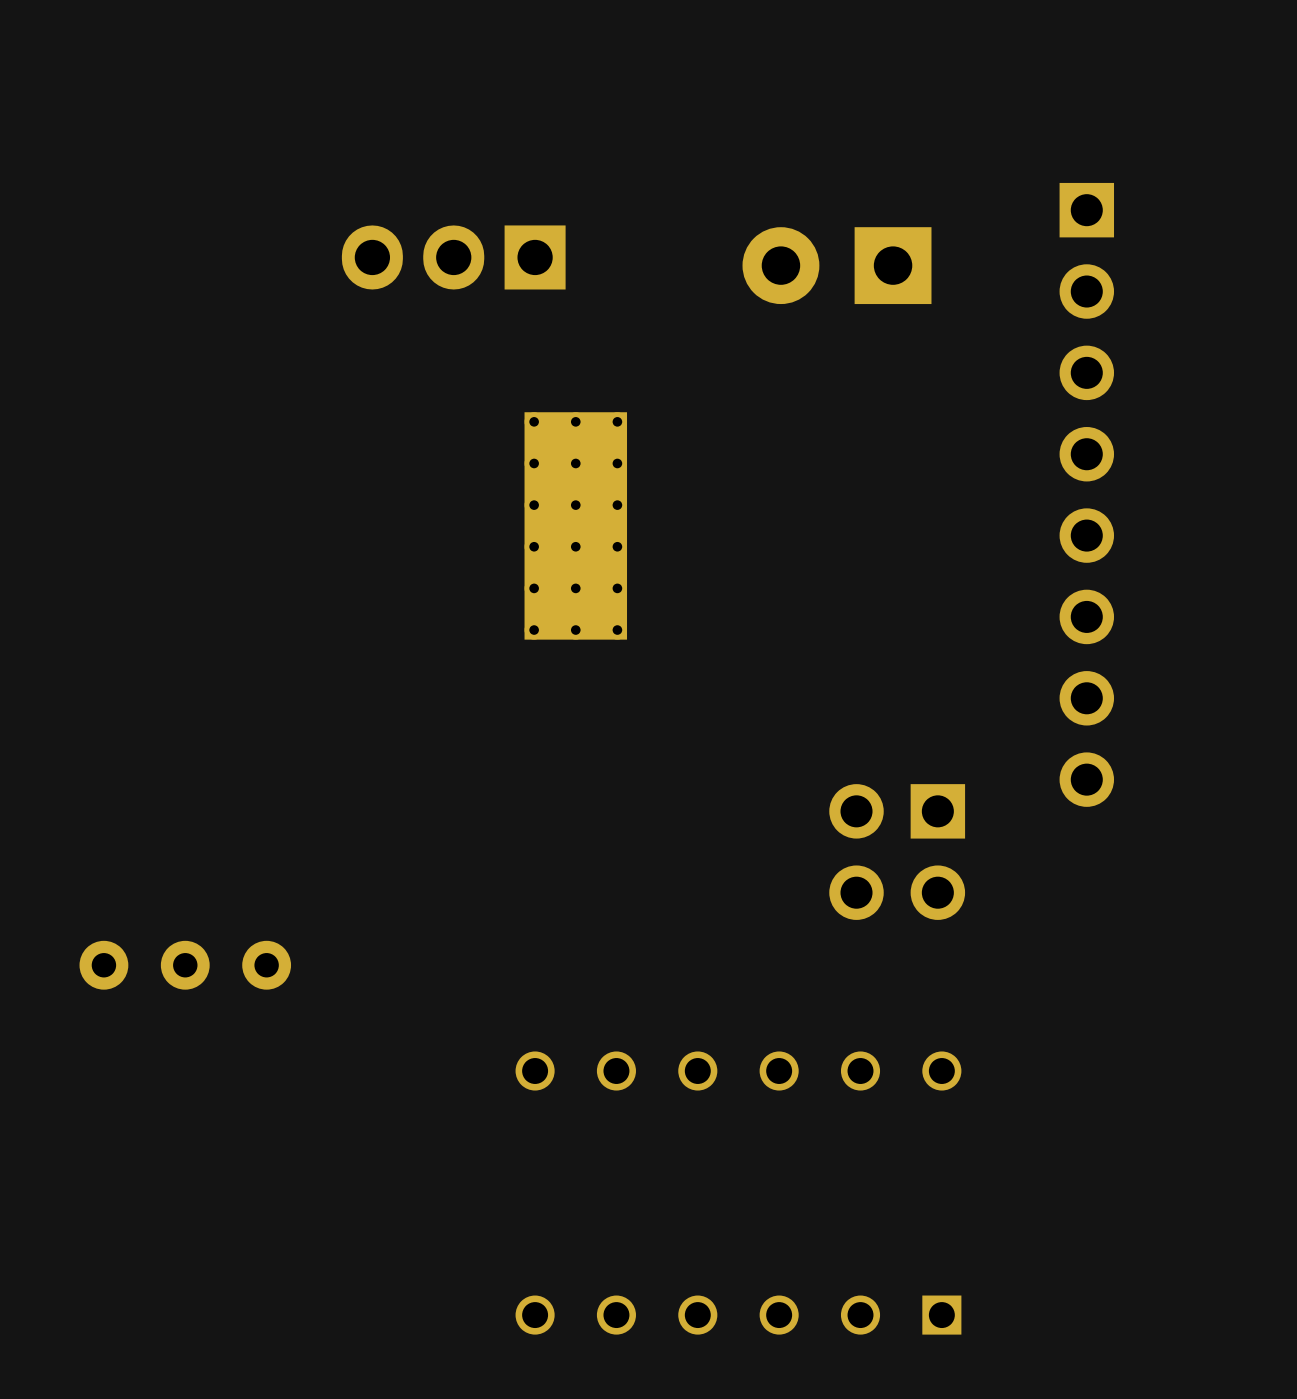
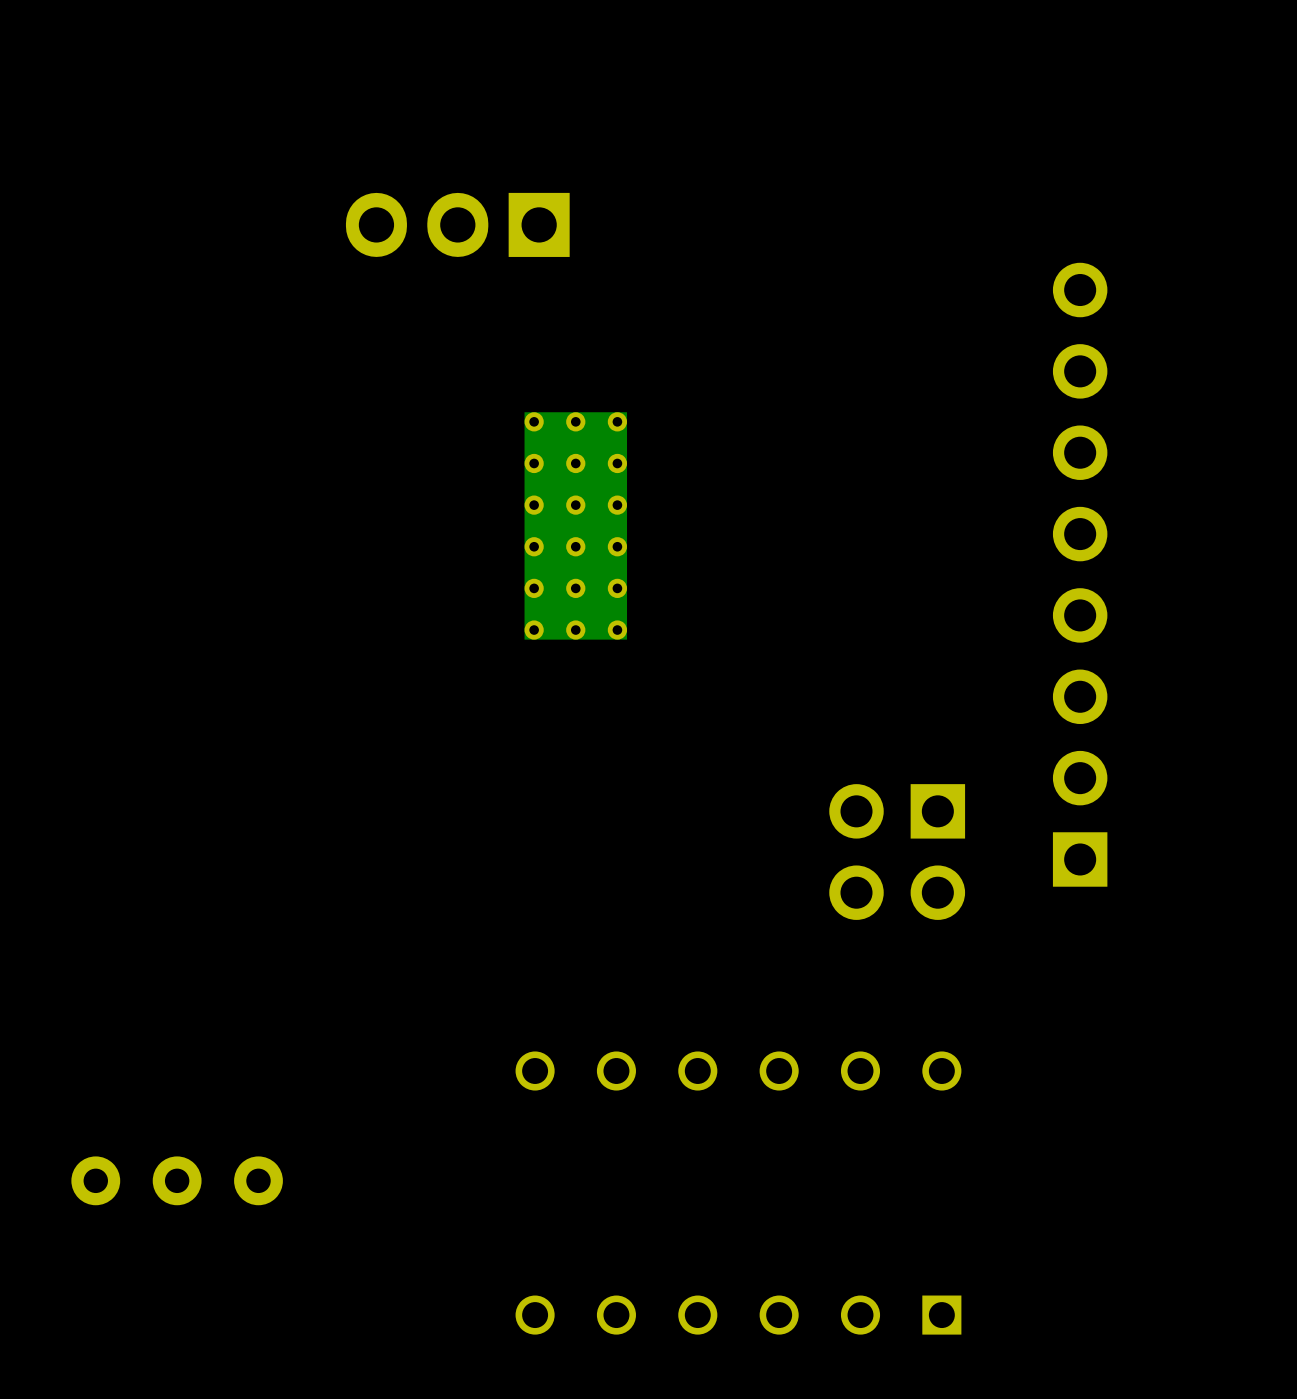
part position: (453, 257) -> (457, 224)
part: (837, 265) -> none
part rotation: 0° (1086, 494) -> 180° (1080, 574)
part position: (185, 965) -> (177, 1180)

